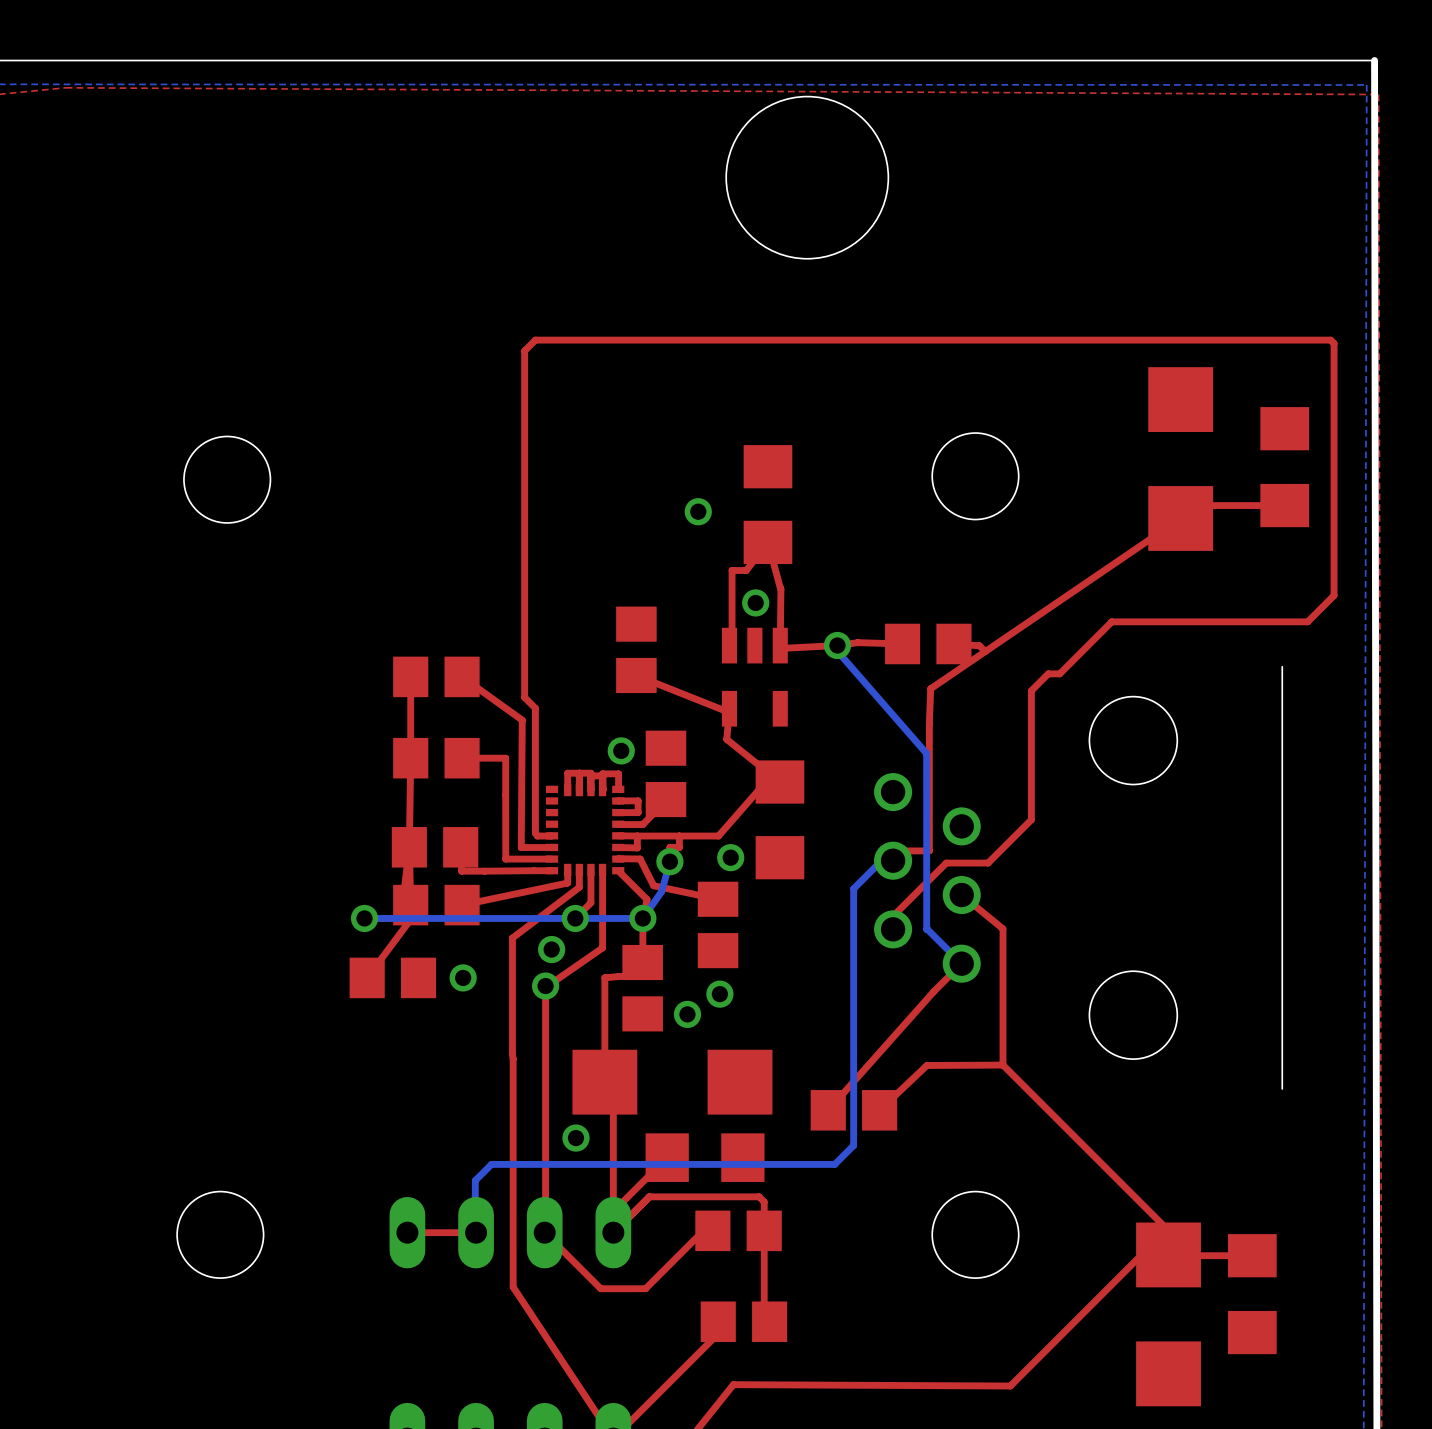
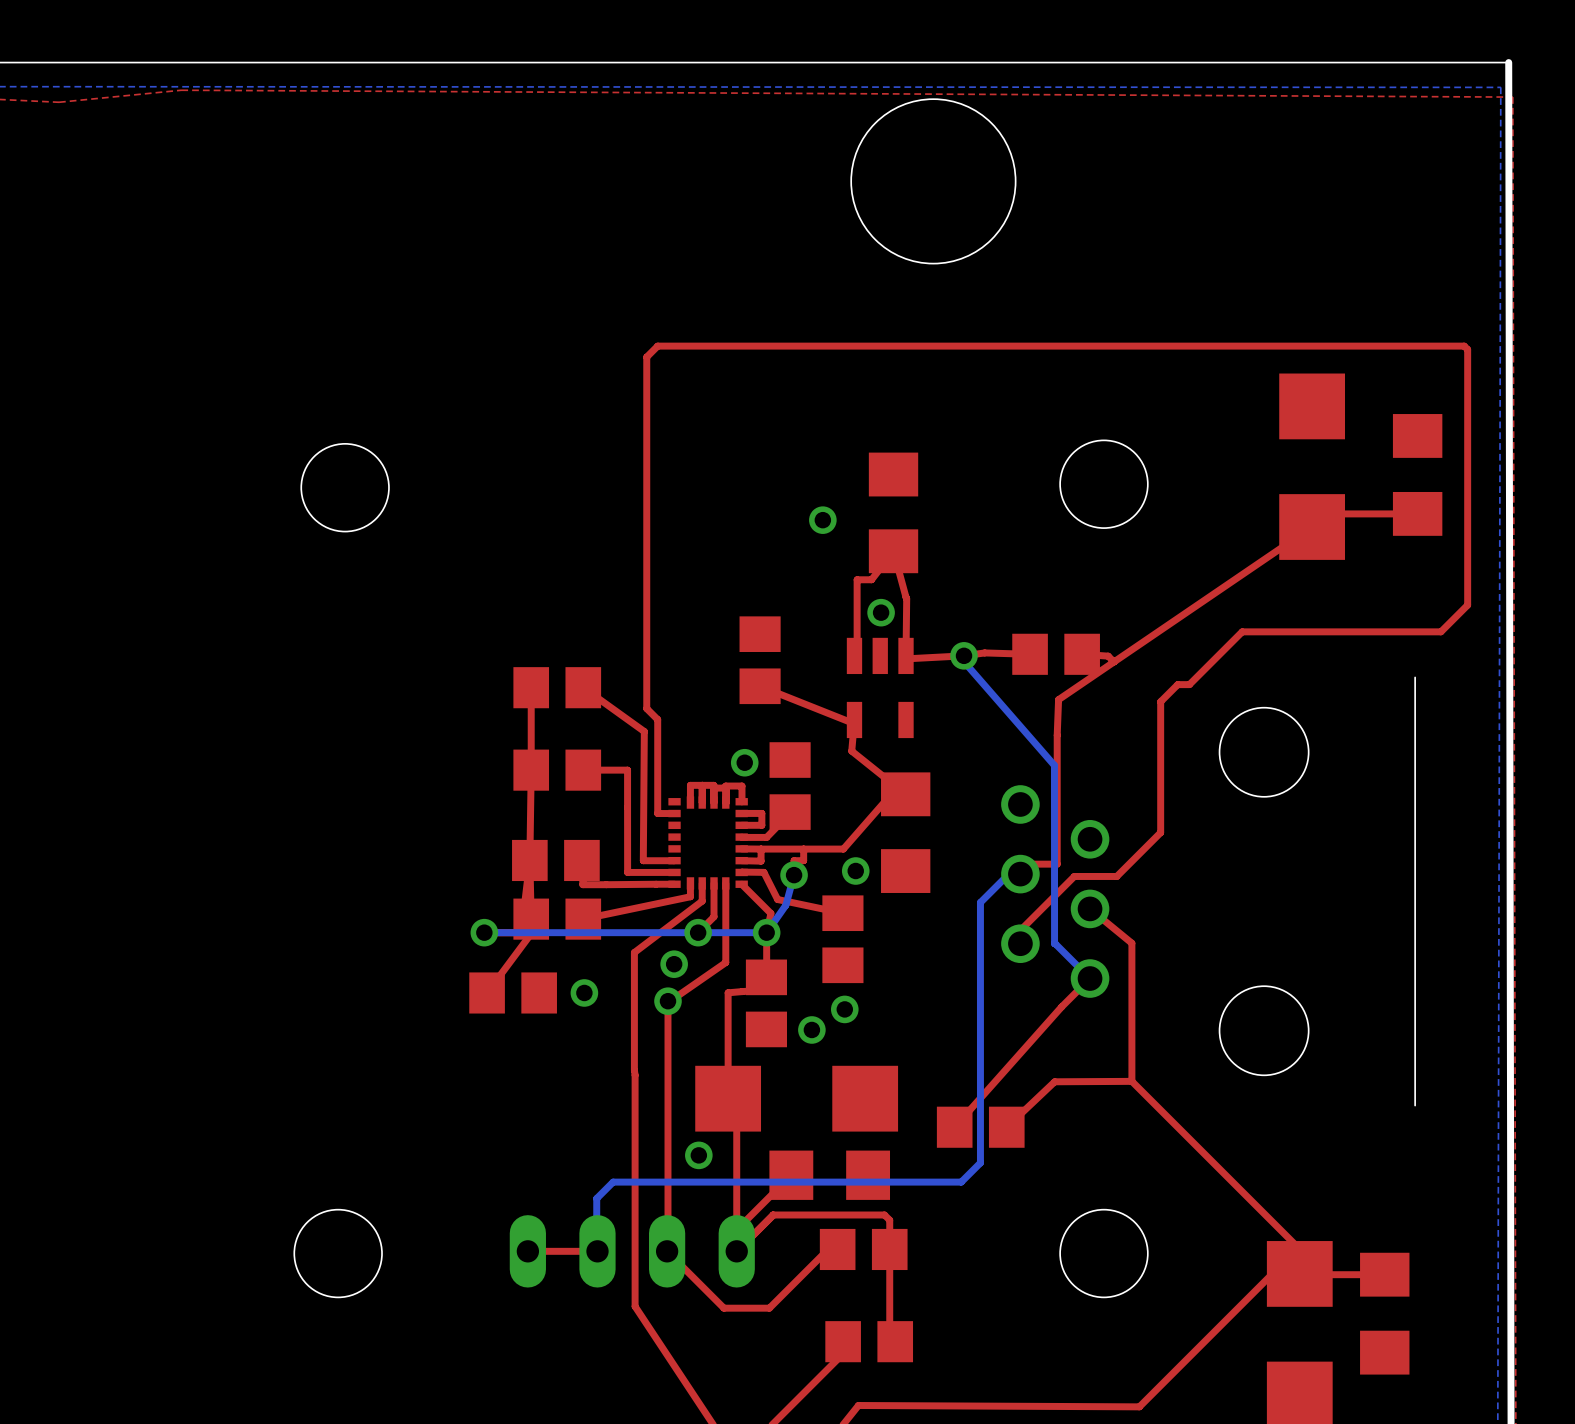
top track: (535, 800) (535, 833) (537, 836) (551, 836) -> (657, 813) (674, 813)

